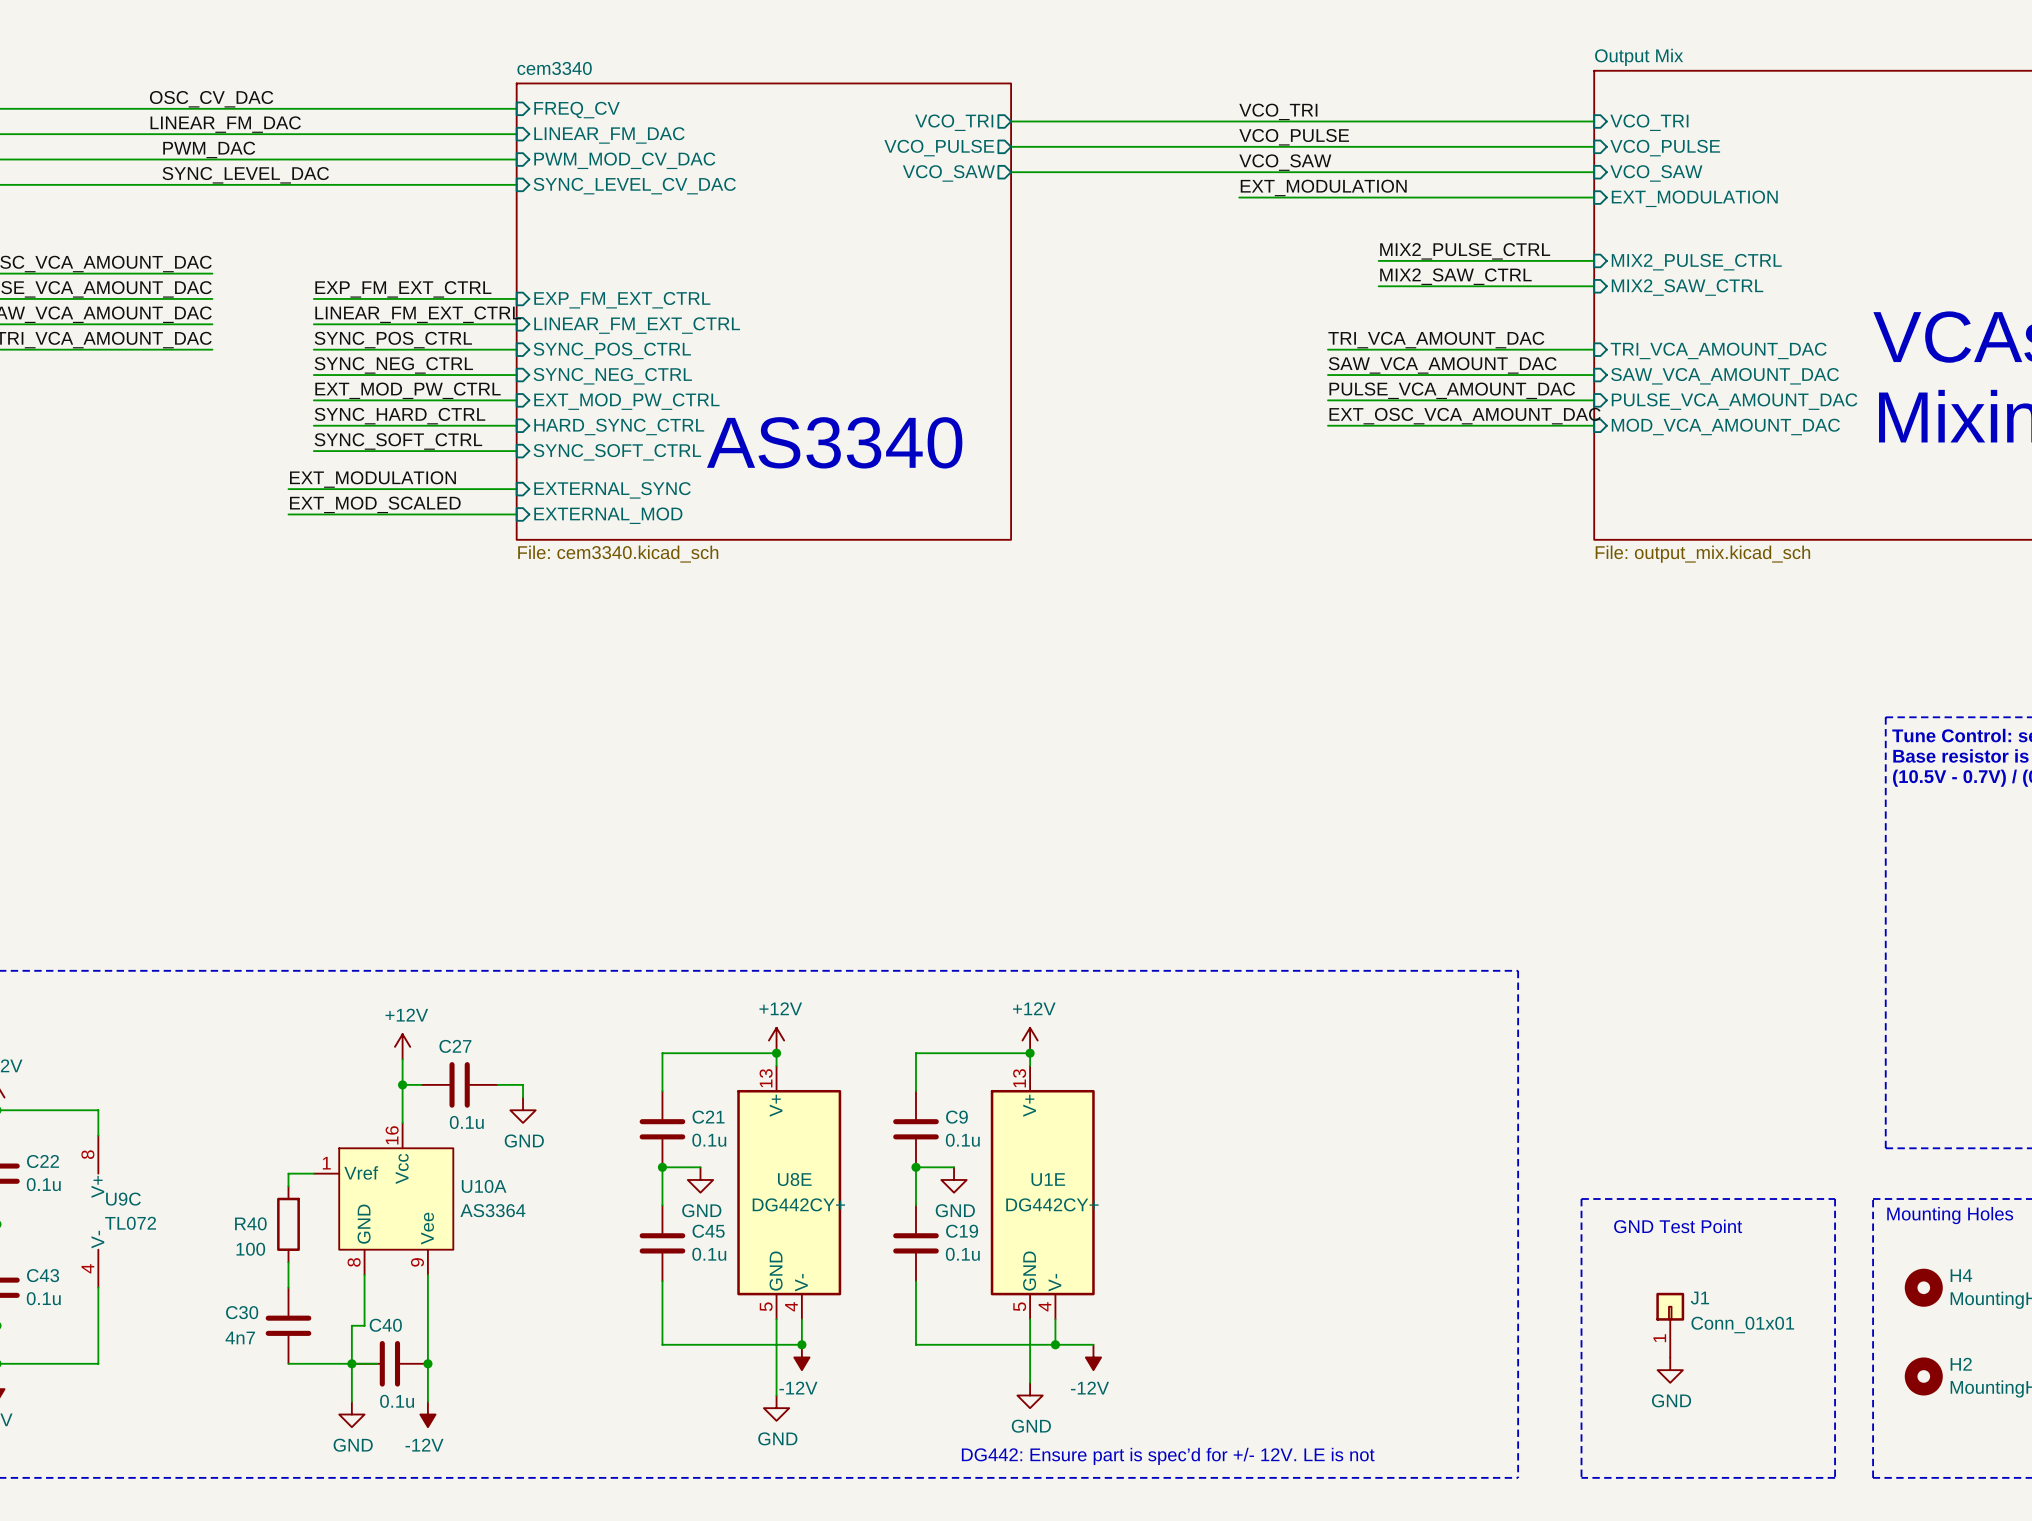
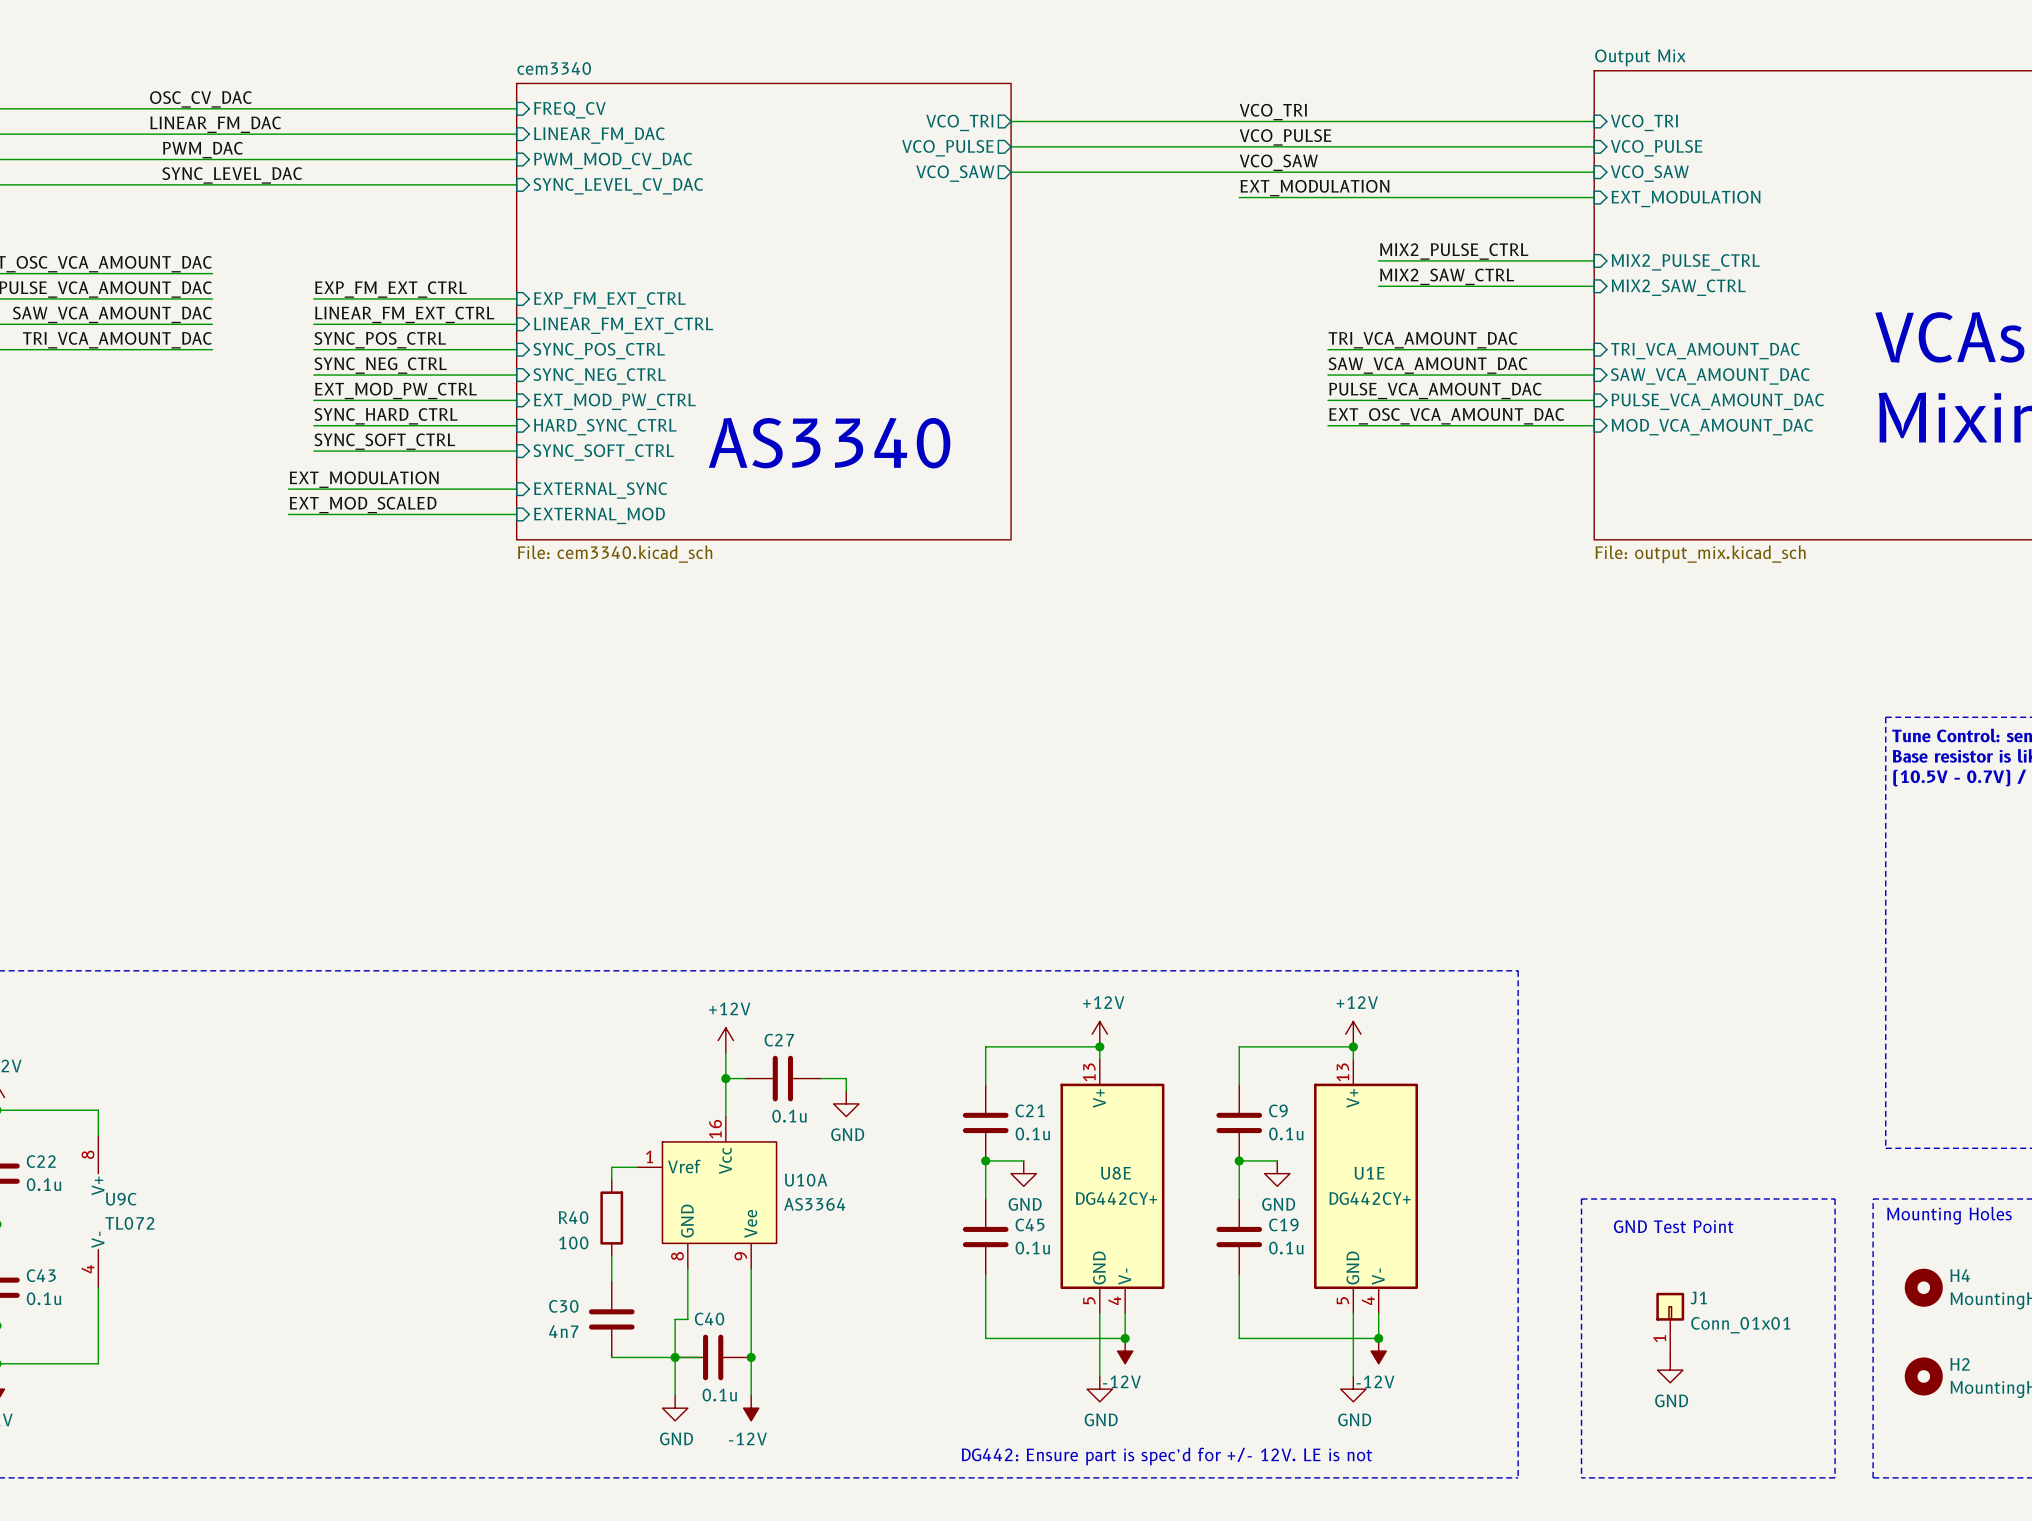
power symbol: none -> +12V (1353, 1034)
power symbol position: +12V (776, 1040) -> +12V (725, 1040)
power symbol position: +12V (1030, 1040) -> +12V (1099, 1034)
power symbol: +12V (402, 1046) -> none
junction: none -> (1099, 1046)
junction: none -> (1353, 1046)
wire: none -> (725, 1053) (725, 1116)
junction: (776, 1053) -> none
junction: (1030, 1053) -> none
wire: (402, 1059) (402, 1122) -> none
wire: none -> (1353, 1059) (1353, 1046) (1239, 1046) (1239, 1084)
wire: (776, 1065) (776, 1053) (662, 1053) (662, 1091) -> none
wire: (1030, 1065) (1030, 1053) (915, 1053) (915, 1091) -> (1099, 1059) (1099, 1046) (985, 1046) (985, 1084)
wire: none -> (725, 1078) (744, 1078)
junction: none -> (725, 1078)
wire: none -> (820, 1078) (846, 1078) (846, 1091)
wire: (402, 1084) (421, 1084) -> none
junction: (402, 1084) -> none
C27 position: (459, 1084) -> (782, 1078)
wire: (497, 1084) (523, 1084) (523, 1097) -> none
power symbol: none -> GND (846, 1103)
power symbol: GND (523, 1110) -> none
C21 position: (662, 1129) -> (985, 1122)
C9 position: (915, 1129) -> (1239, 1122)
junction: none -> (985, 1160)
junction: none -> (1239, 1160)
wire: none -> (1277, 1160) (1239, 1160) (1239, 1199)
wire: none -> (637, 1167) (611, 1167) (611, 1179)
junction: (662, 1167) -> none
junction: (915, 1167) -> none
wire: (954, 1167) (915, 1167) (915, 1205) -> (1023, 1160) (985, 1160) (985, 1199)
wire: (313, 1173) (288, 1173) (288, 1186) -> none
power symbol: none -> GND (1023, 1173)
power symbol: none -> GND (1277, 1173)
power symbol: GND (700, 1179) -> none
power symbol: GND (954, 1179) -> none
U8E position: (789, 1192) -> (1112, 1186)
U1E position: (1042, 1192) -> (1366, 1186)
U10A position: (383, 1199) -> (707, 1192)
R40 position: (288, 1224) -> (611, 1218)
C45 position: (662, 1243) -> (985, 1237)
C19 position: (915, 1243) -> (1239, 1237)
wire: none -> (611, 1256) (611, 1281)
wire: (288, 1262) (288, 1287) -> none
wire: none -> (687, 1268) (687, 1319) (675, 1319) (675, 1395)
wire: none -> (751, 1268) (751, 1395)
wire: (364, 1275) (364, 1325) (351, 1325) (351, 1401) -> none
wire: (427, 1275) (427, 1401) -> none
wire: none -> (985, 1275) (985, 1338) (1125, 1338) (1125, 1313)
wire: none -> (1239, 1275) (1239, 1338) (1378, 1338) (1378, 1313)
wire: (662, 1281) (662, 1344) (801, 1344) (801, 1319) -> none
wire: (915, 1281) (915, 1344) (1093, 1344) -> none
wire: none -> (1353, 1313) (1353, 1376)
wire: (776, 1319) (776, 1395) -> none
wire: (1030, 1319) (1030, 1382) -> (1099, 1313) (1099, 1376)
wire: (1055, 1319) (1055, 1344) -> none
C30 position: (288, 1325) -> (611, 1319)
junction: none -> (1125, 1338)
junction: none -> (1378, 1338)
junction position: (801, 1344) -> (751, 1357)
junction: (1055, 1344) -> none
power symbol: none -> -12V (1378, 1351)
wire: none -> (611, 1357) (700, 1357)
junction: none -> (675, 1357)
power symbol position: -12V (801, 1357) -> -12V (751, 1408)
power symbol position: -12V (1093, 1357) -> -12V (1125, 1351)
wire: (288, 1363) (377, 1363) -> none
junction: (351, 1363) -> none
C40 position: (389, 1363) -> (713, 1357)
junction: (427, 1363) -> none
power symbol: none -> GND (1353, 1389)
power symbol position: GND (1030, 1395) -> GND (1099, 1389)
power symbol position: GND (776, 1408) -> GND (675, 1408)
power symbol: GND (351, 1414) -> none
power symbol: -12V (427, 1414) -> none

